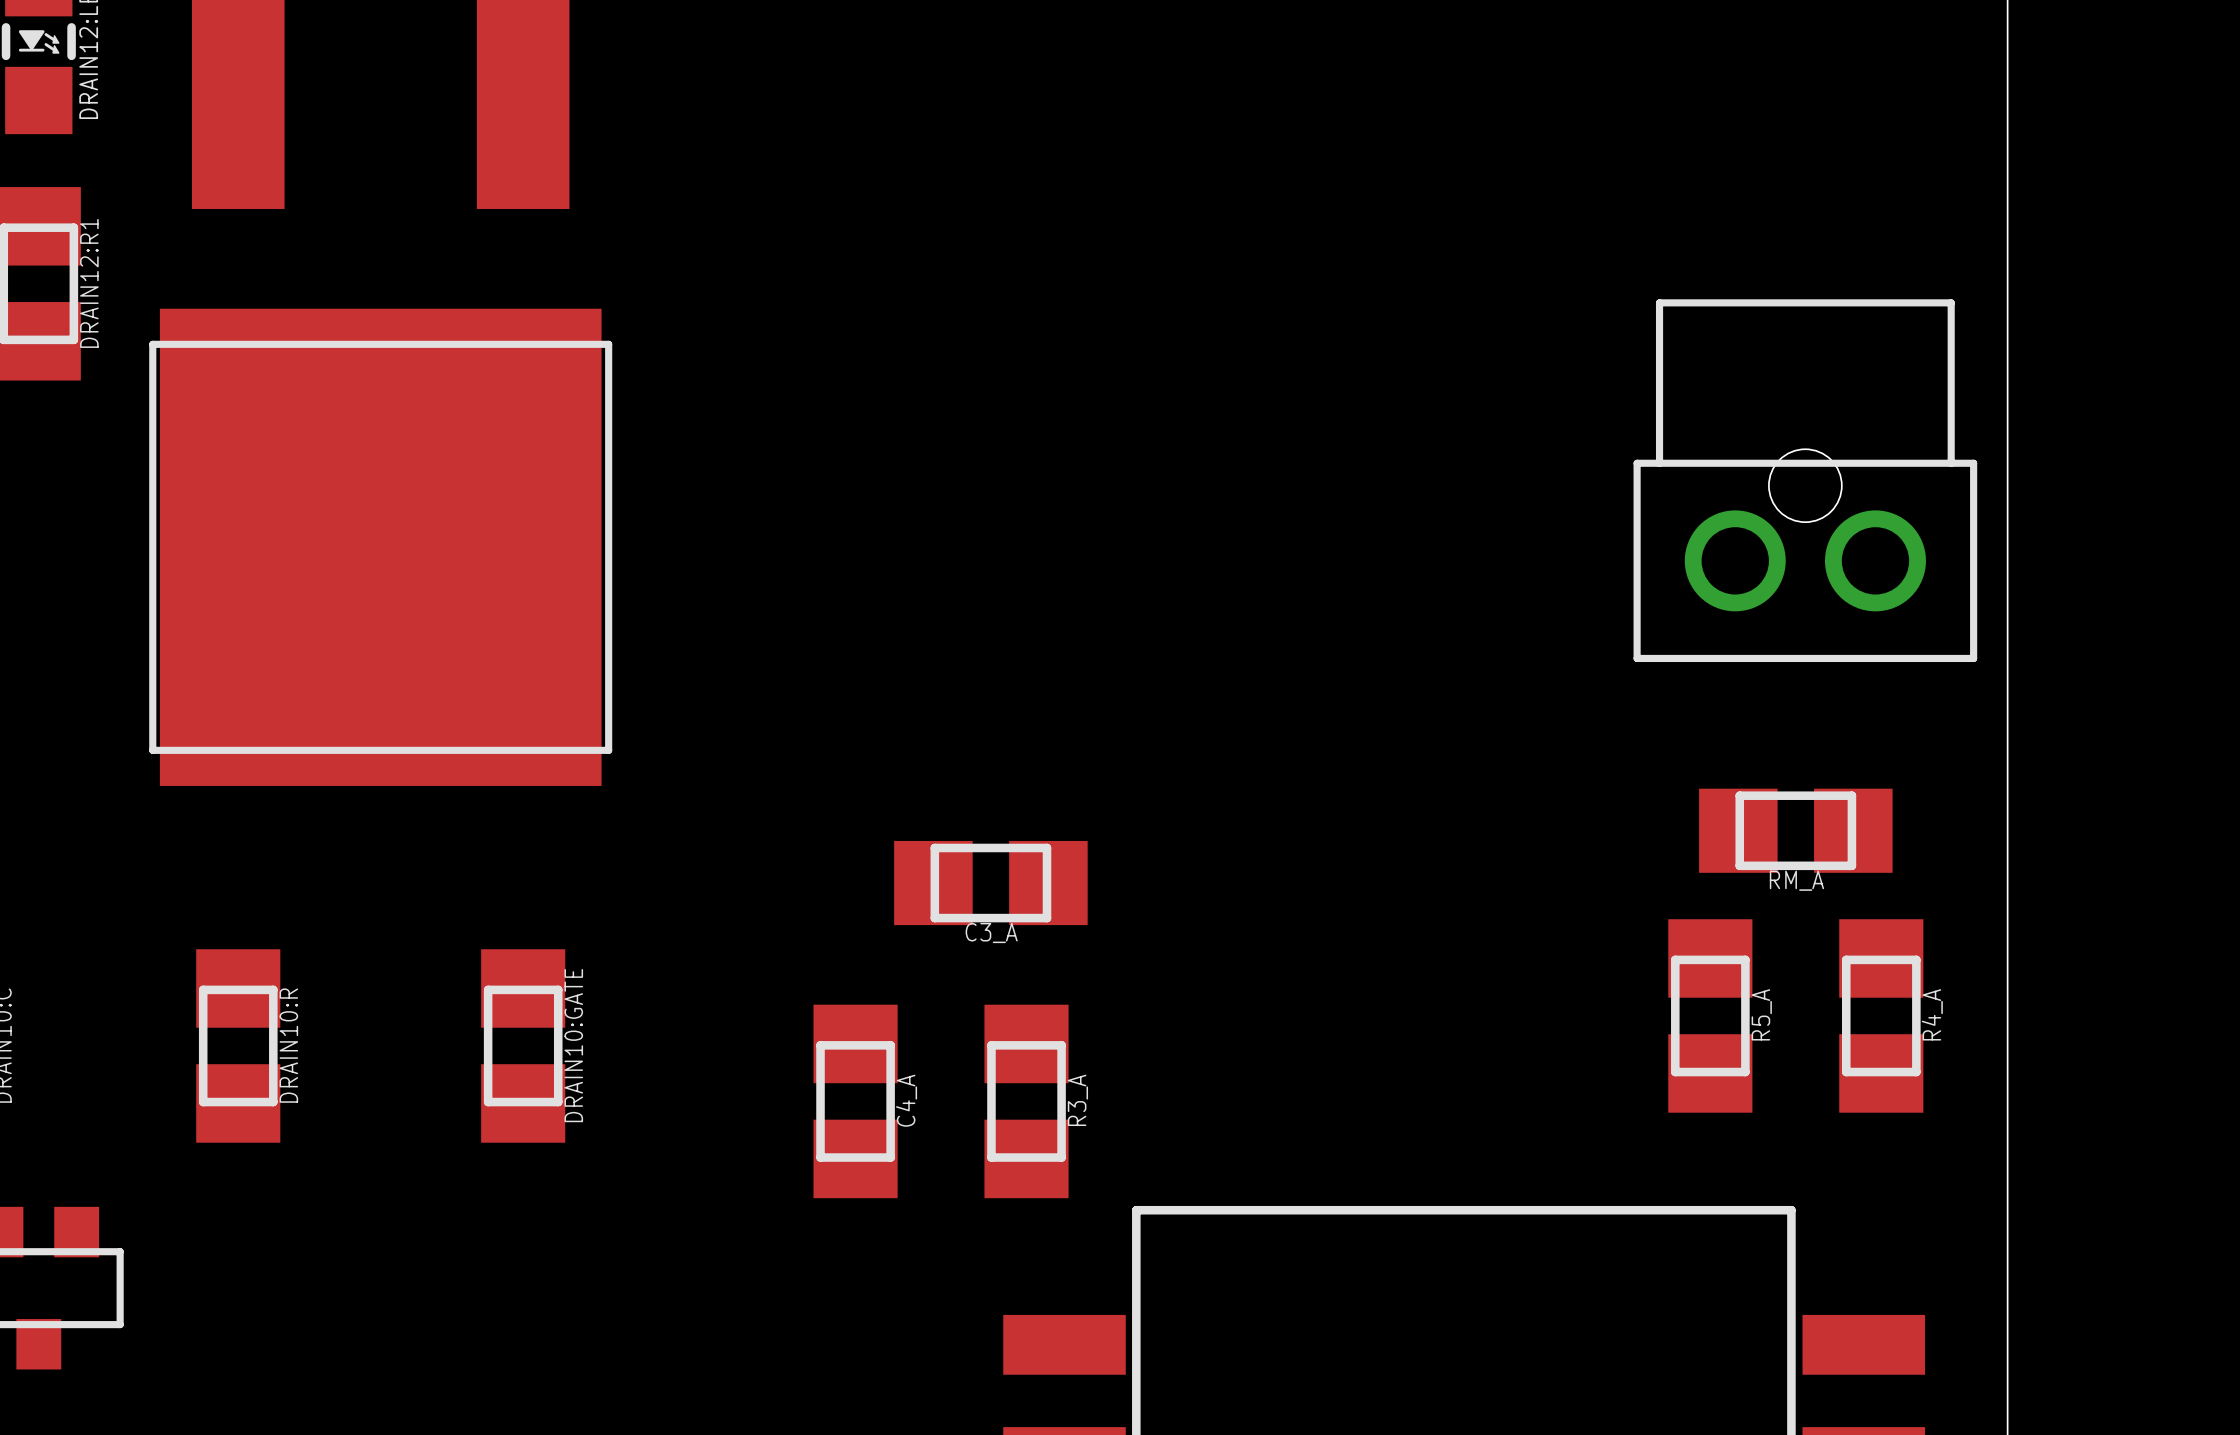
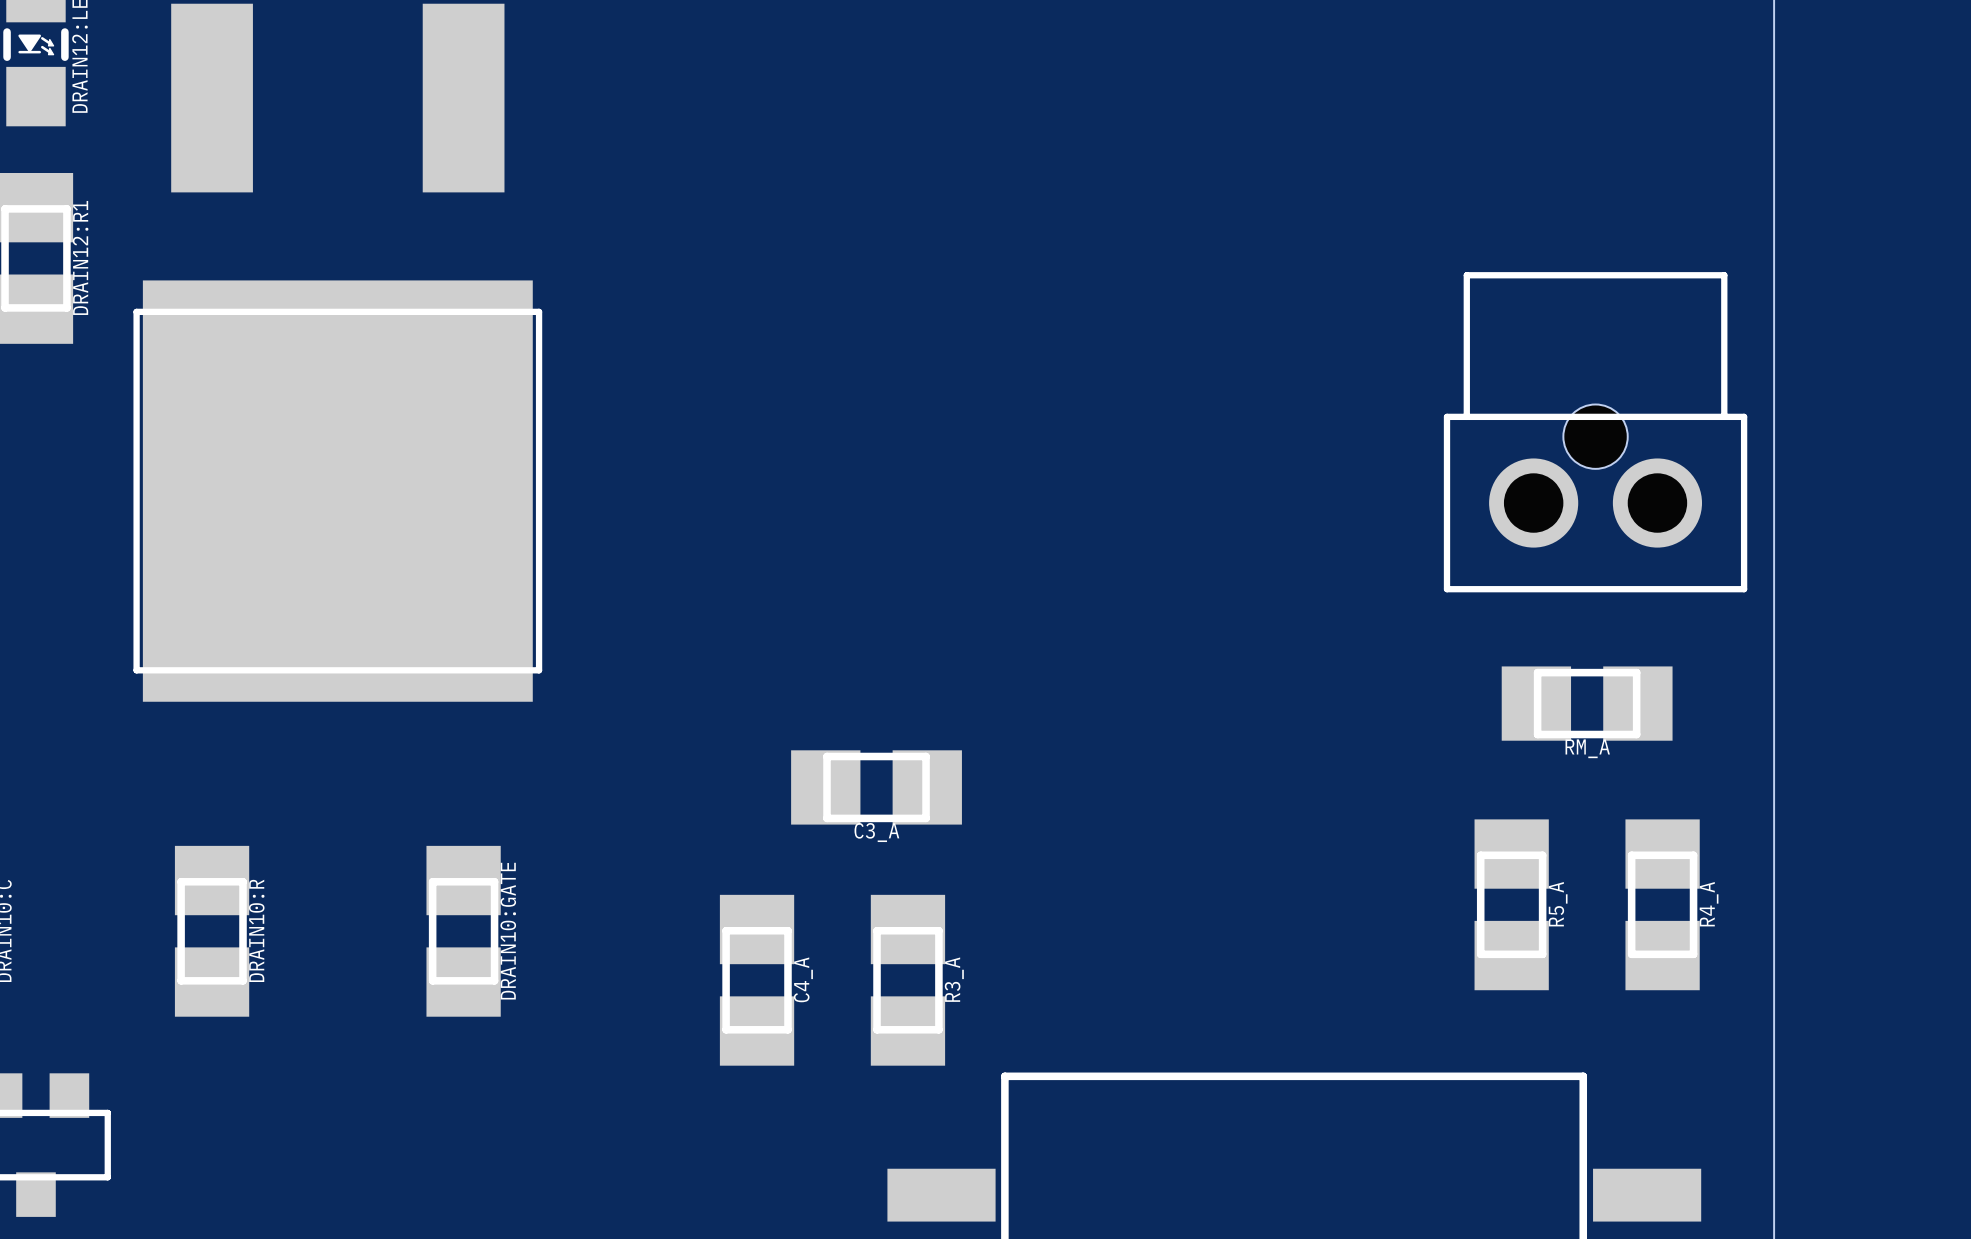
RM_A position: (1795, 830) -> (1587, 703)

